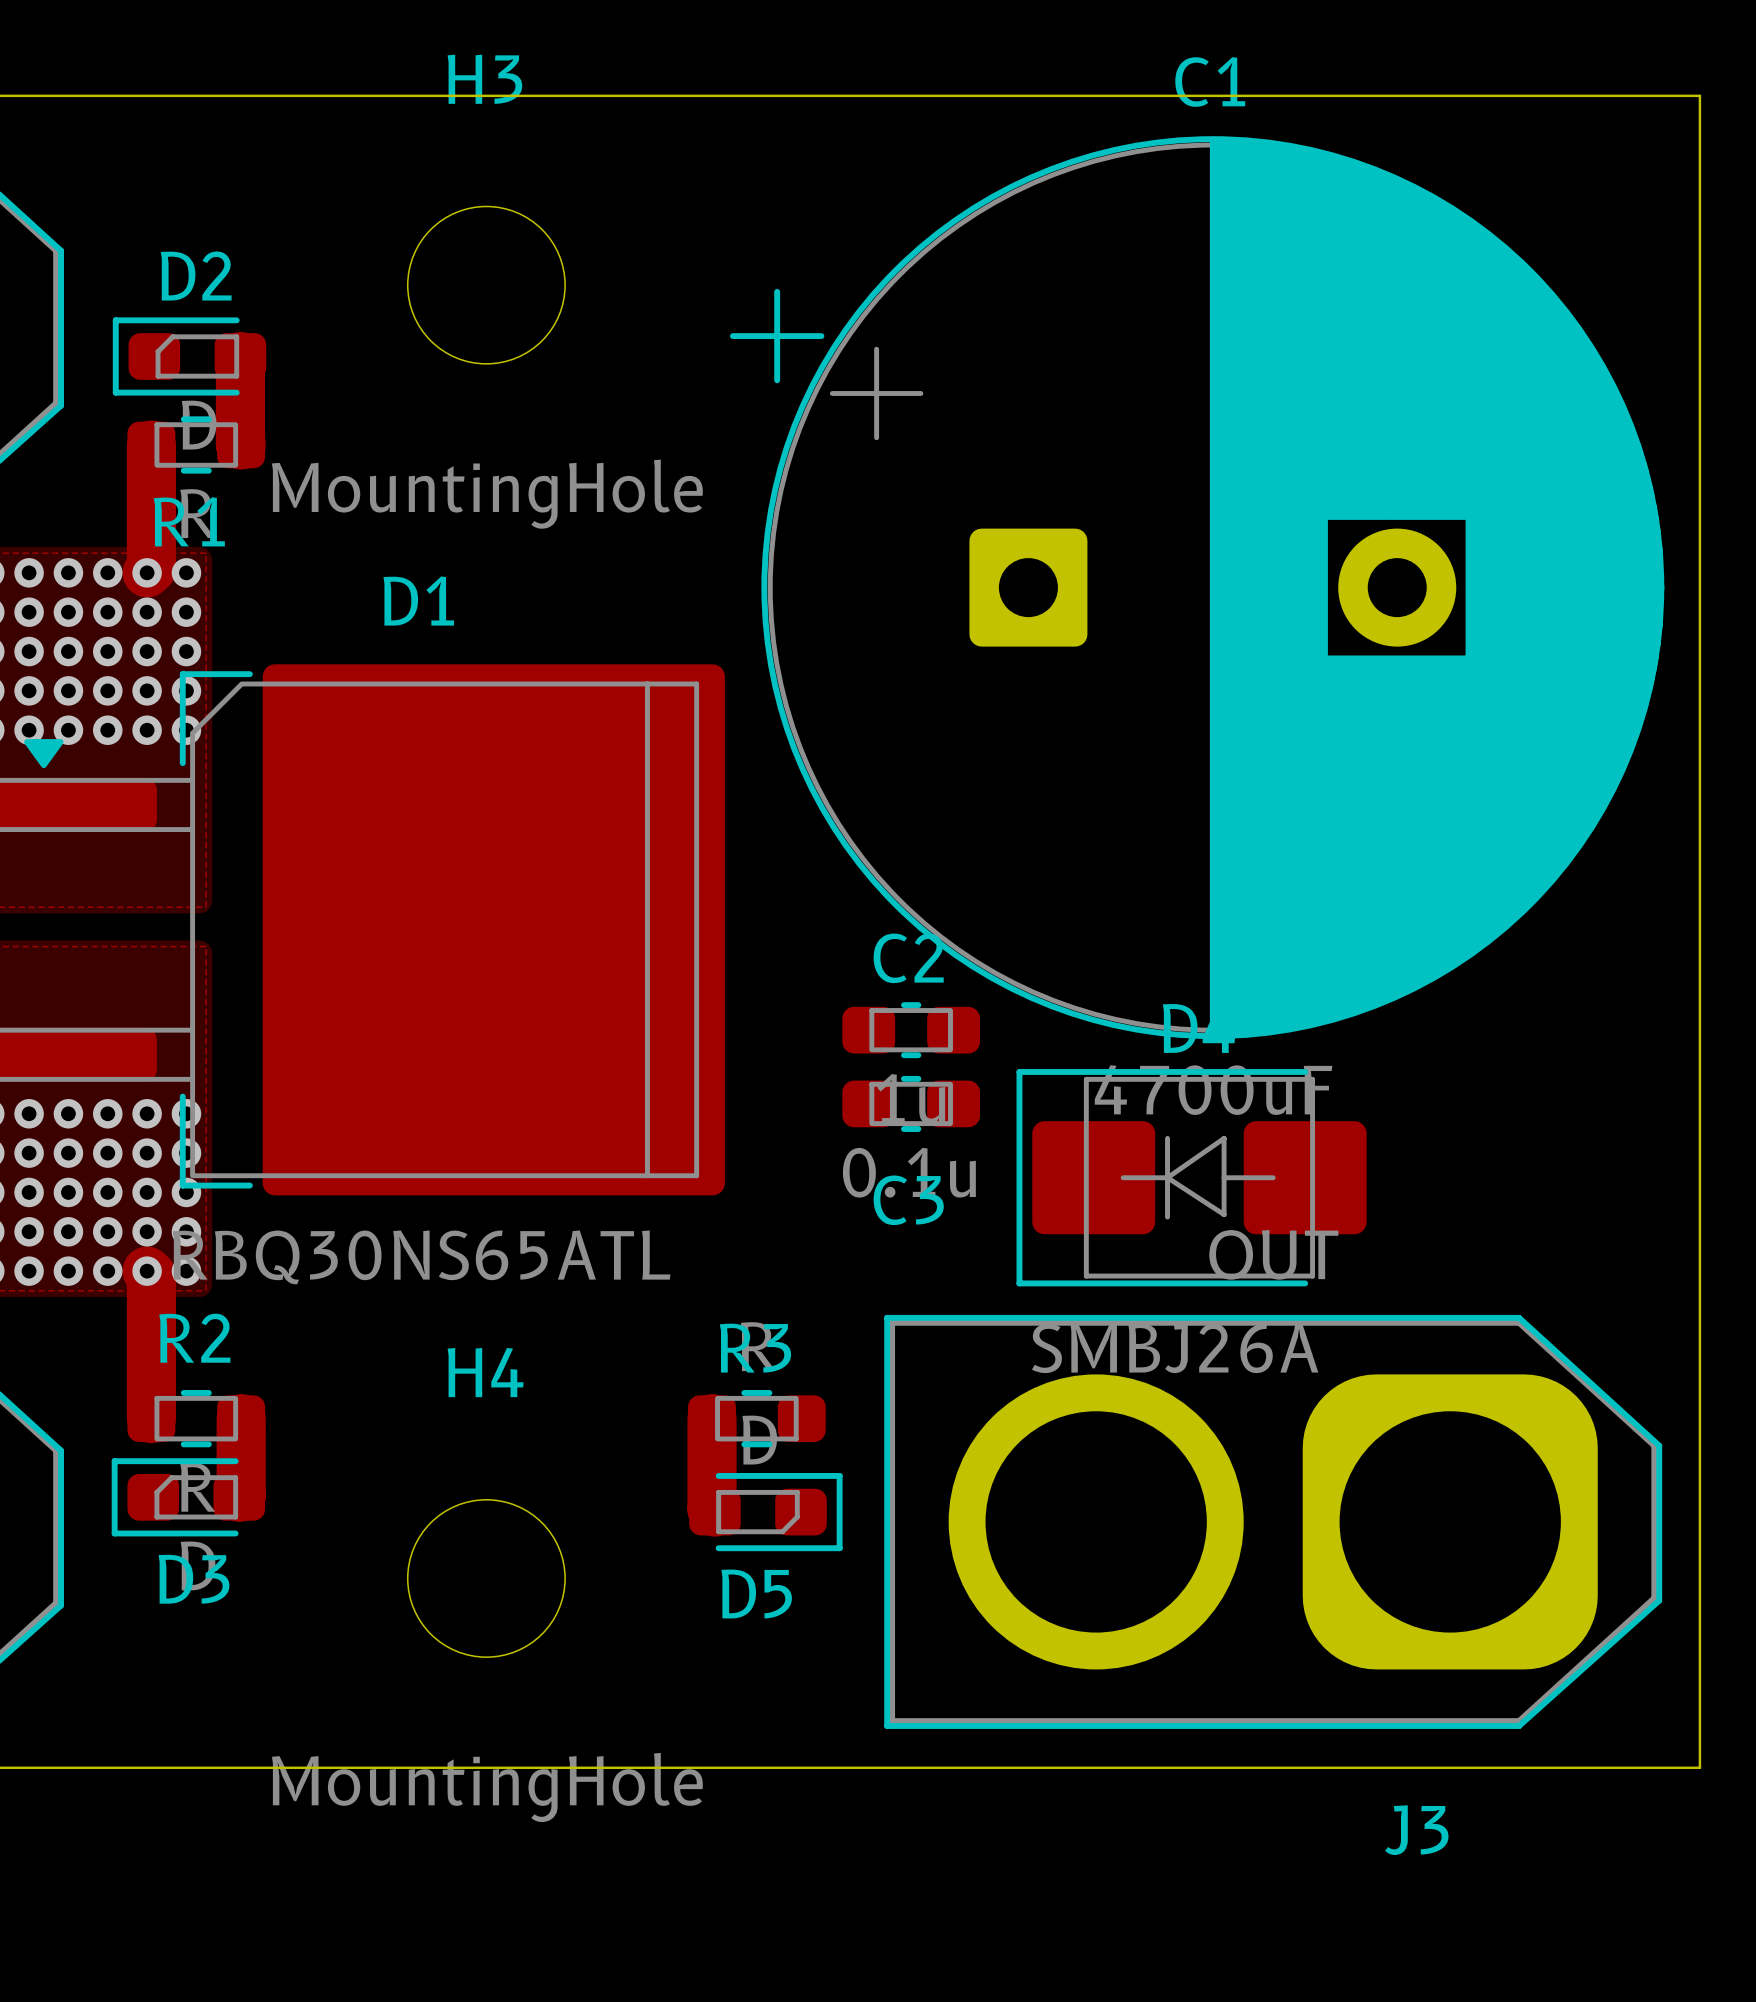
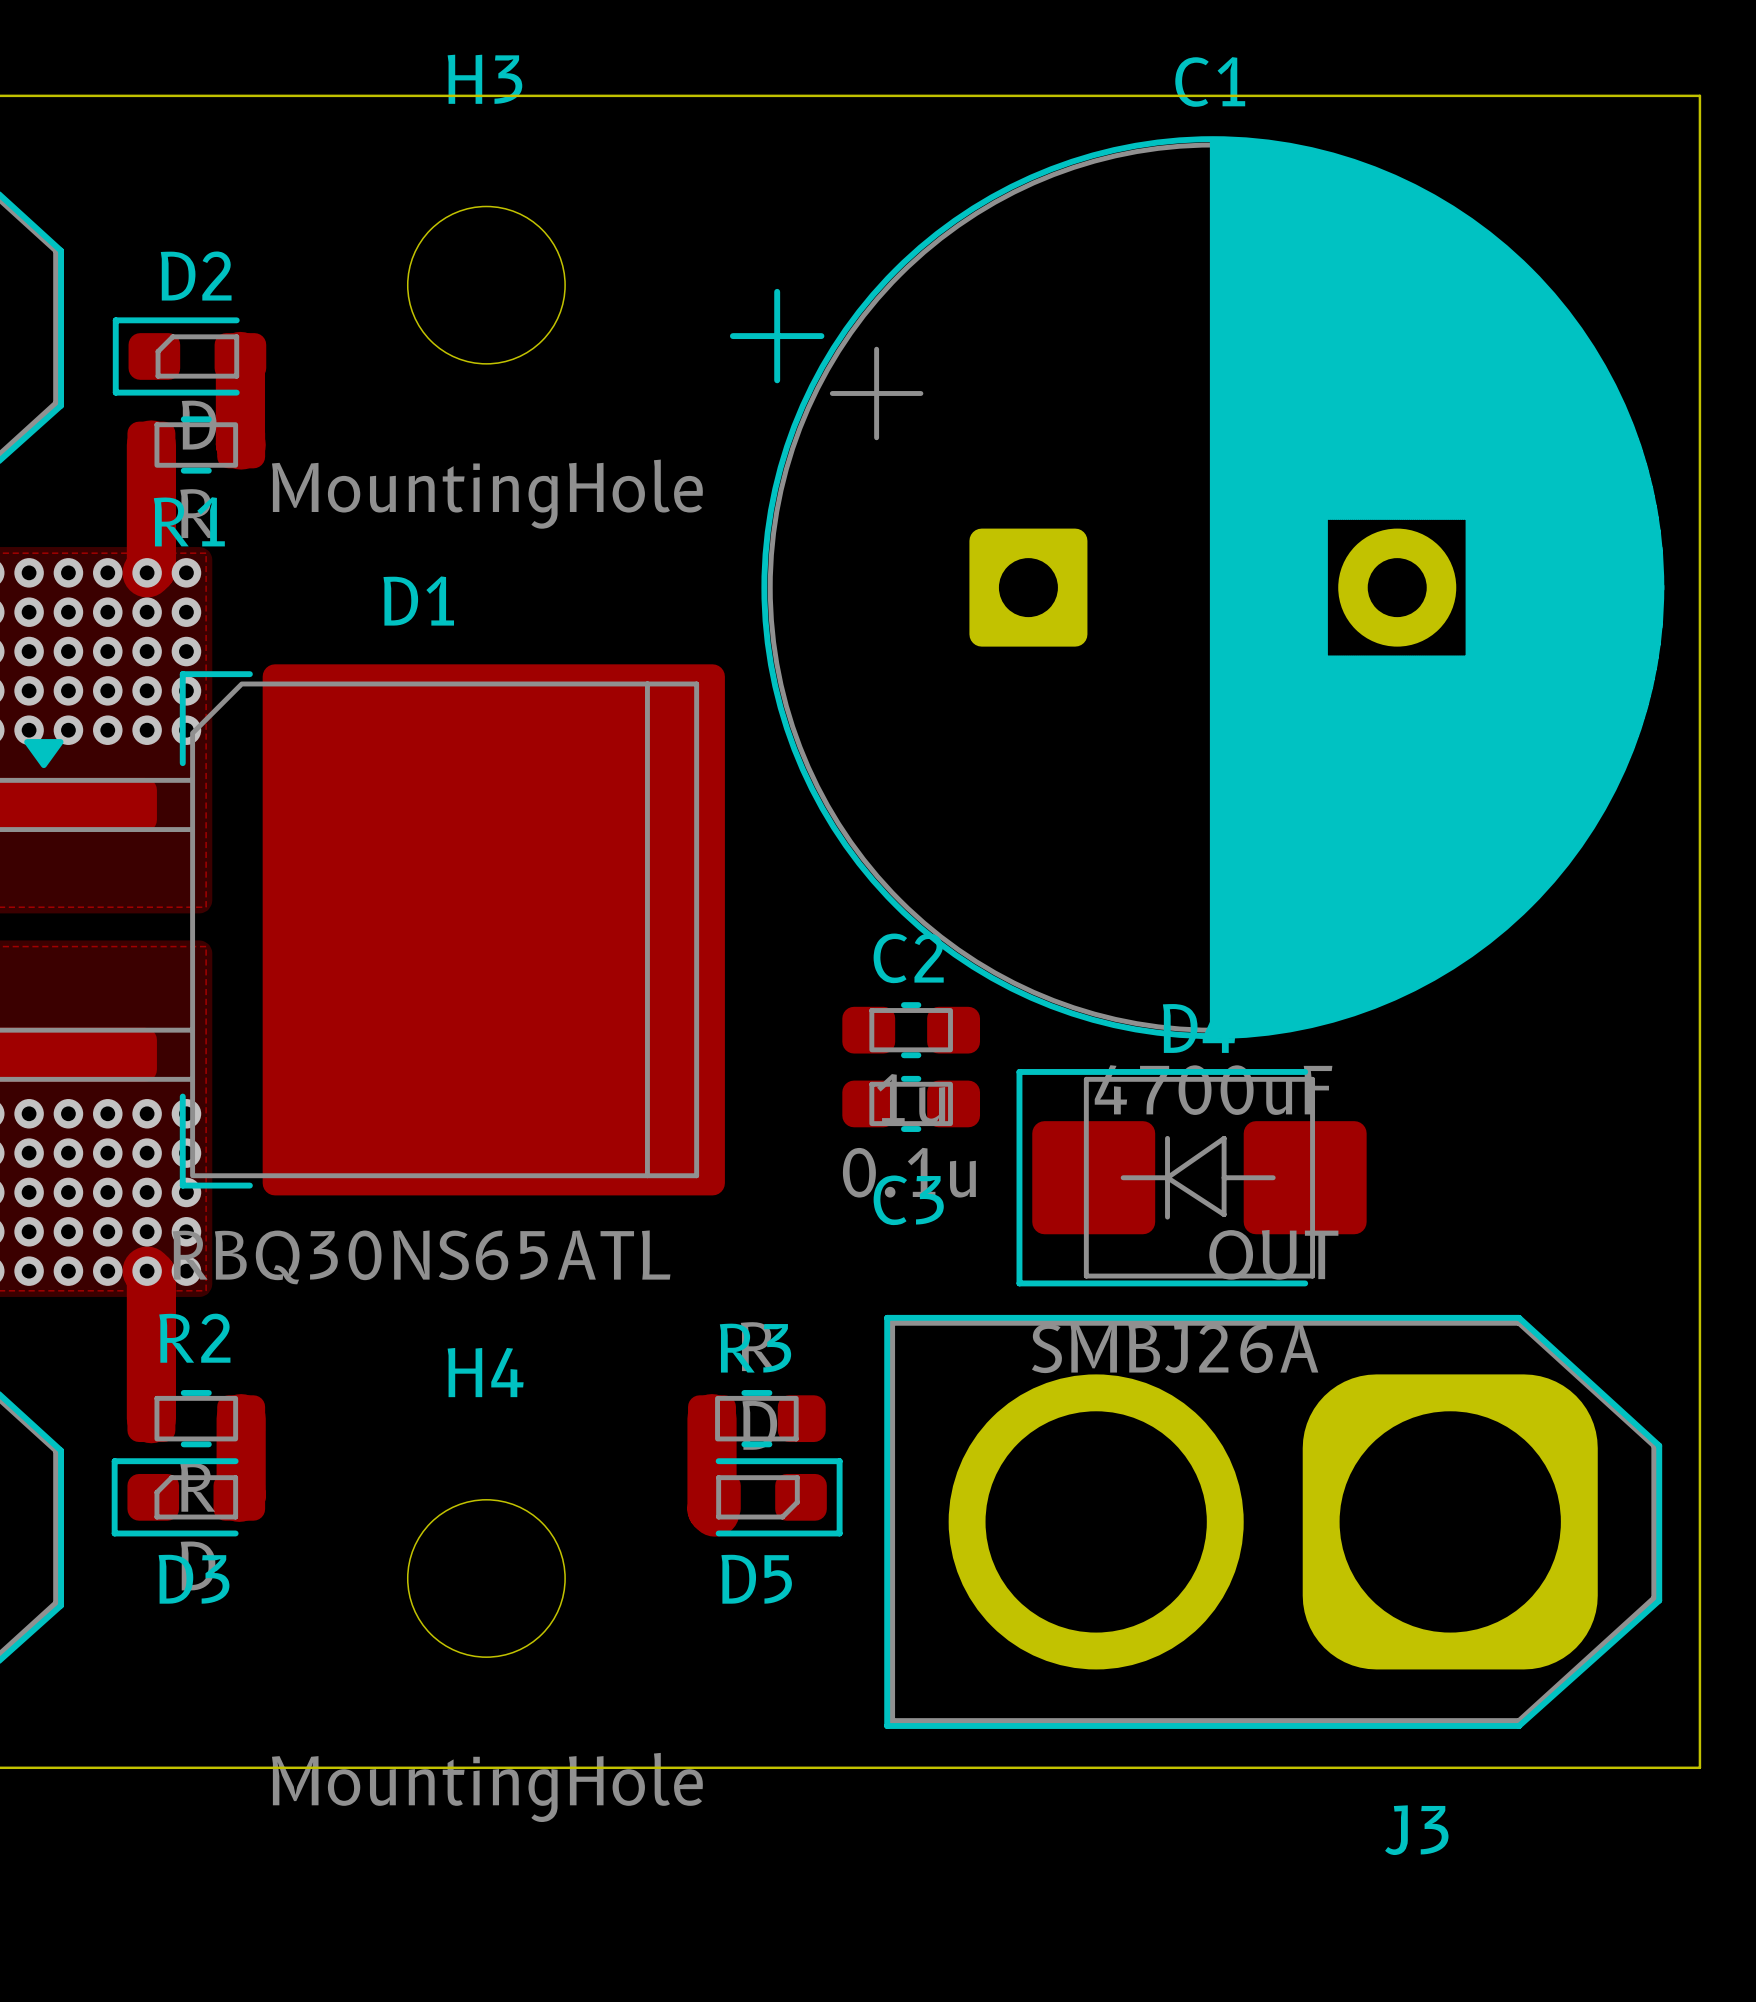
D5 position: (765, 1512) -> (765, 1497)

